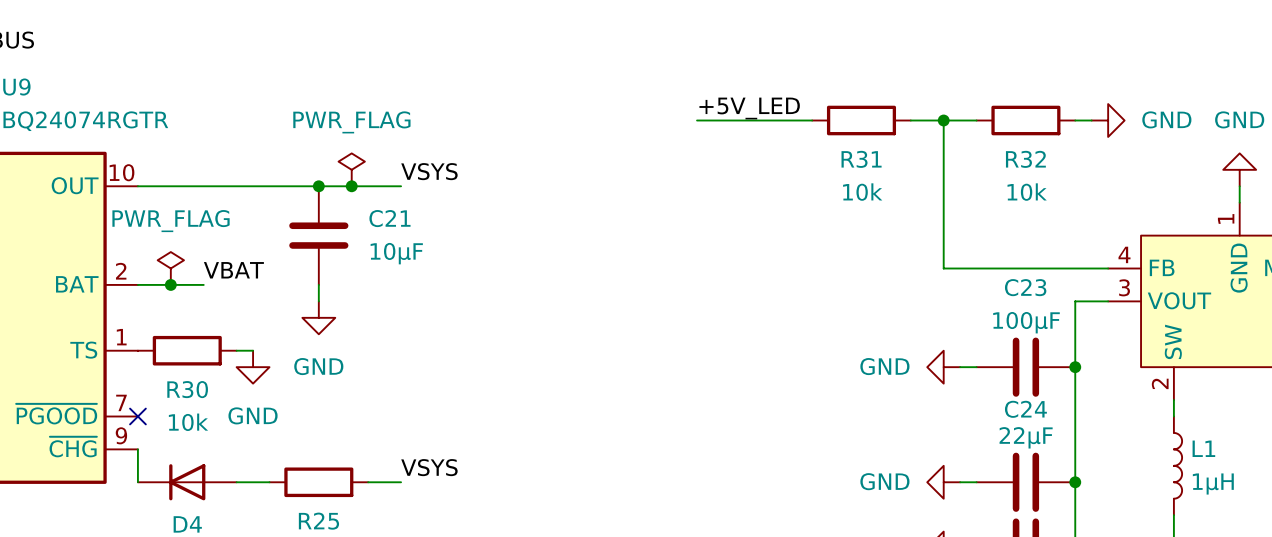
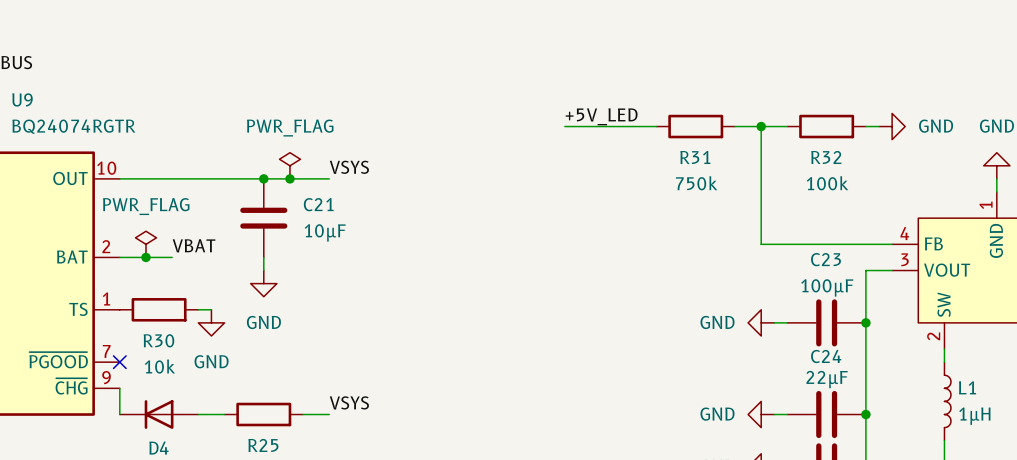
R31 value: 10k (862, 192) -> 750k (696, 183)
R32 value: 10k (1027, 192) -> 100k (827, 183)

